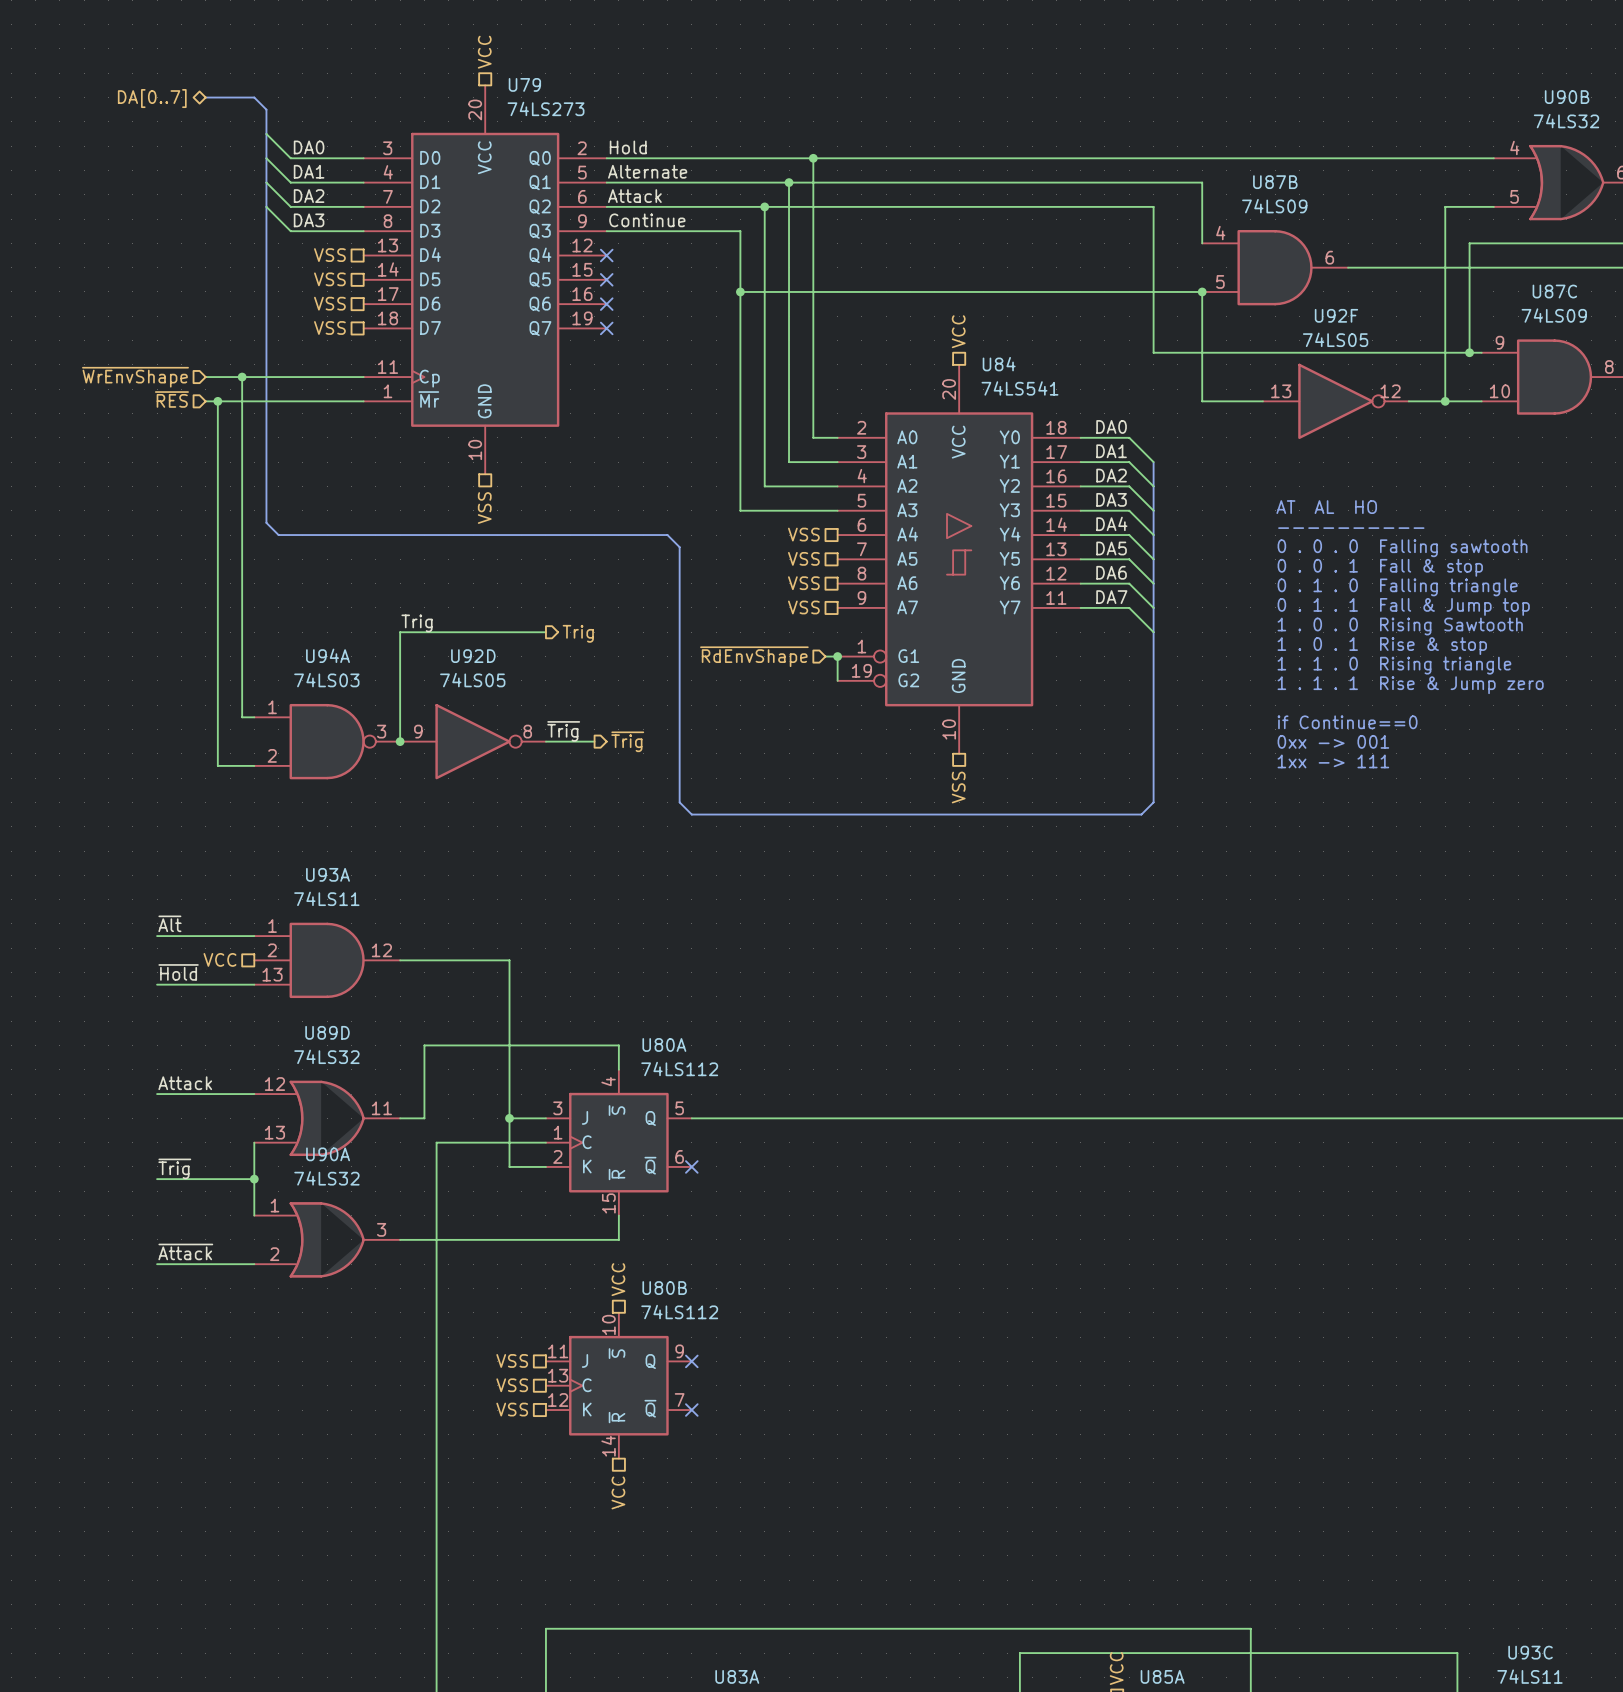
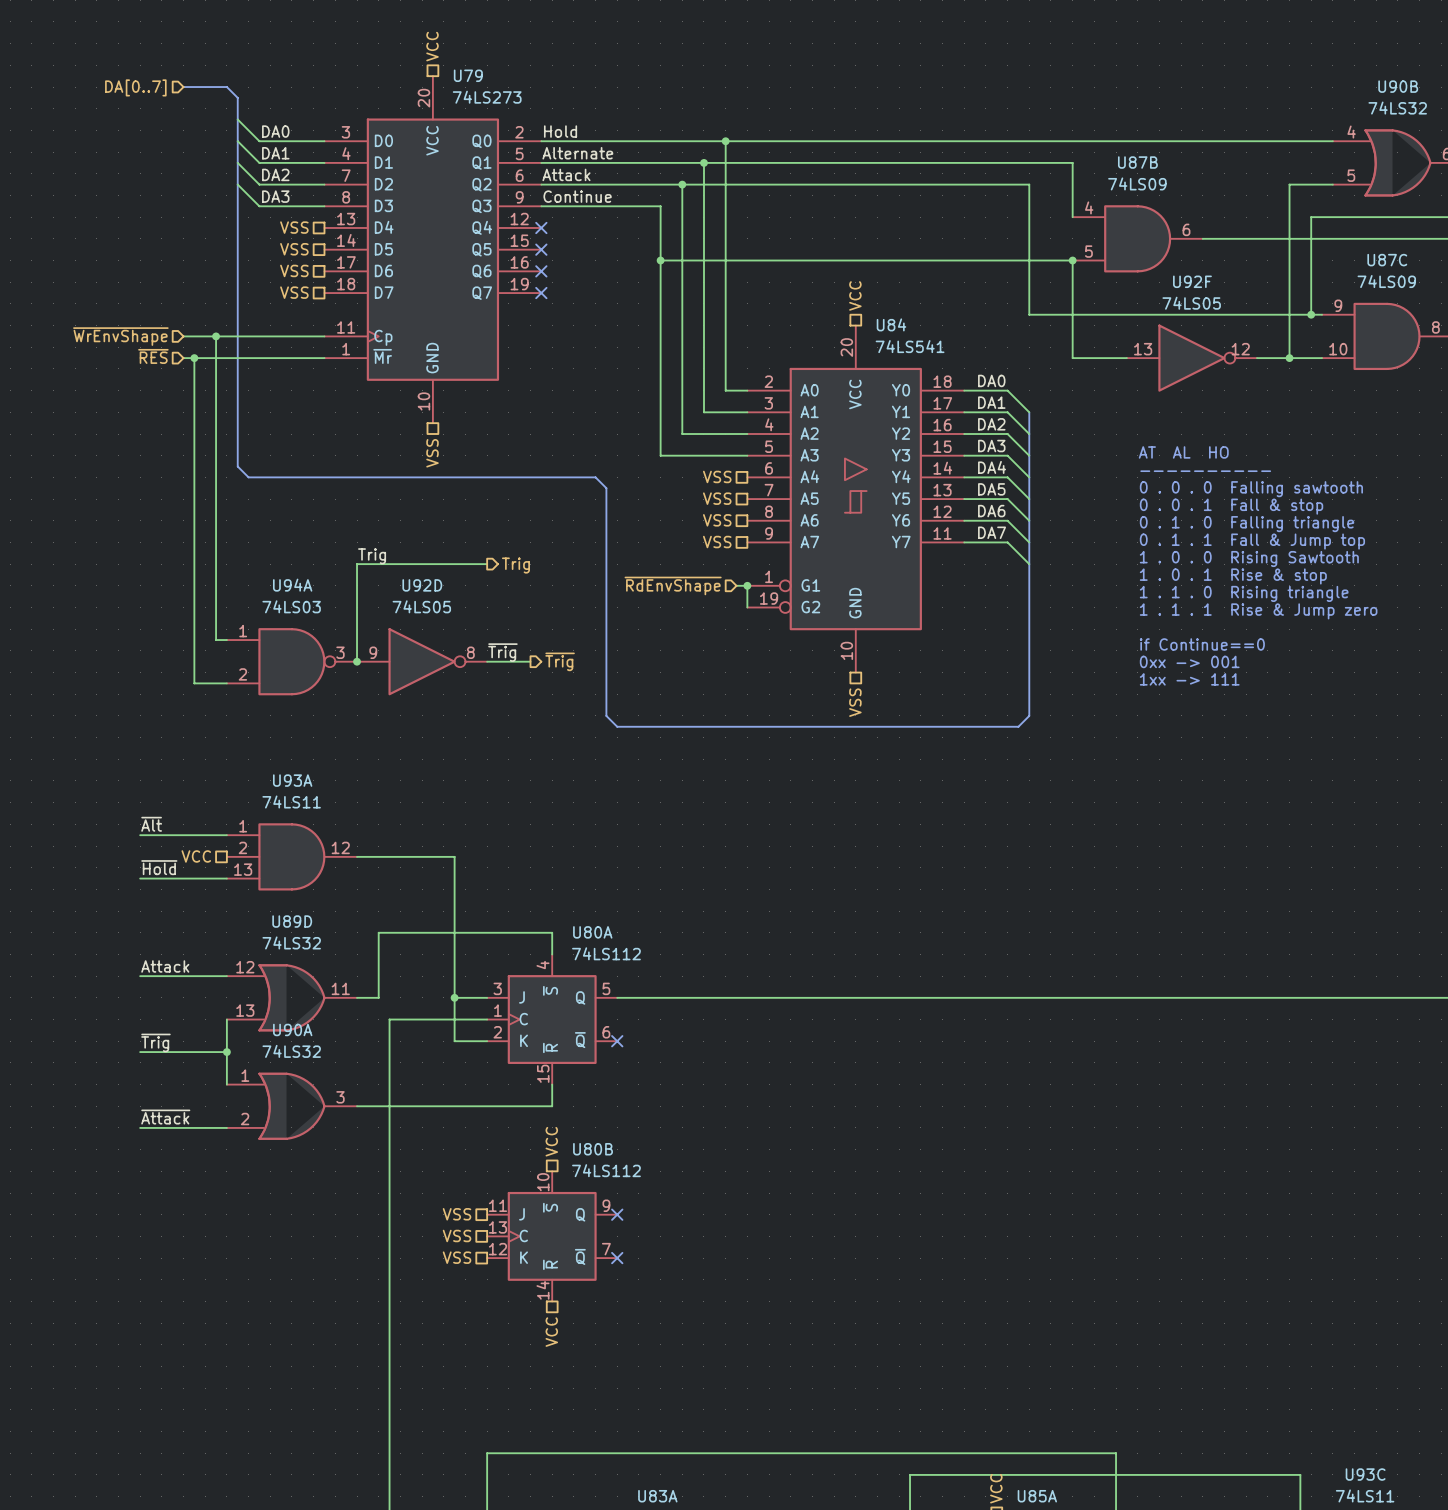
hierarchical label shape: bidirectional (152, 98) -> input (135, 87)

